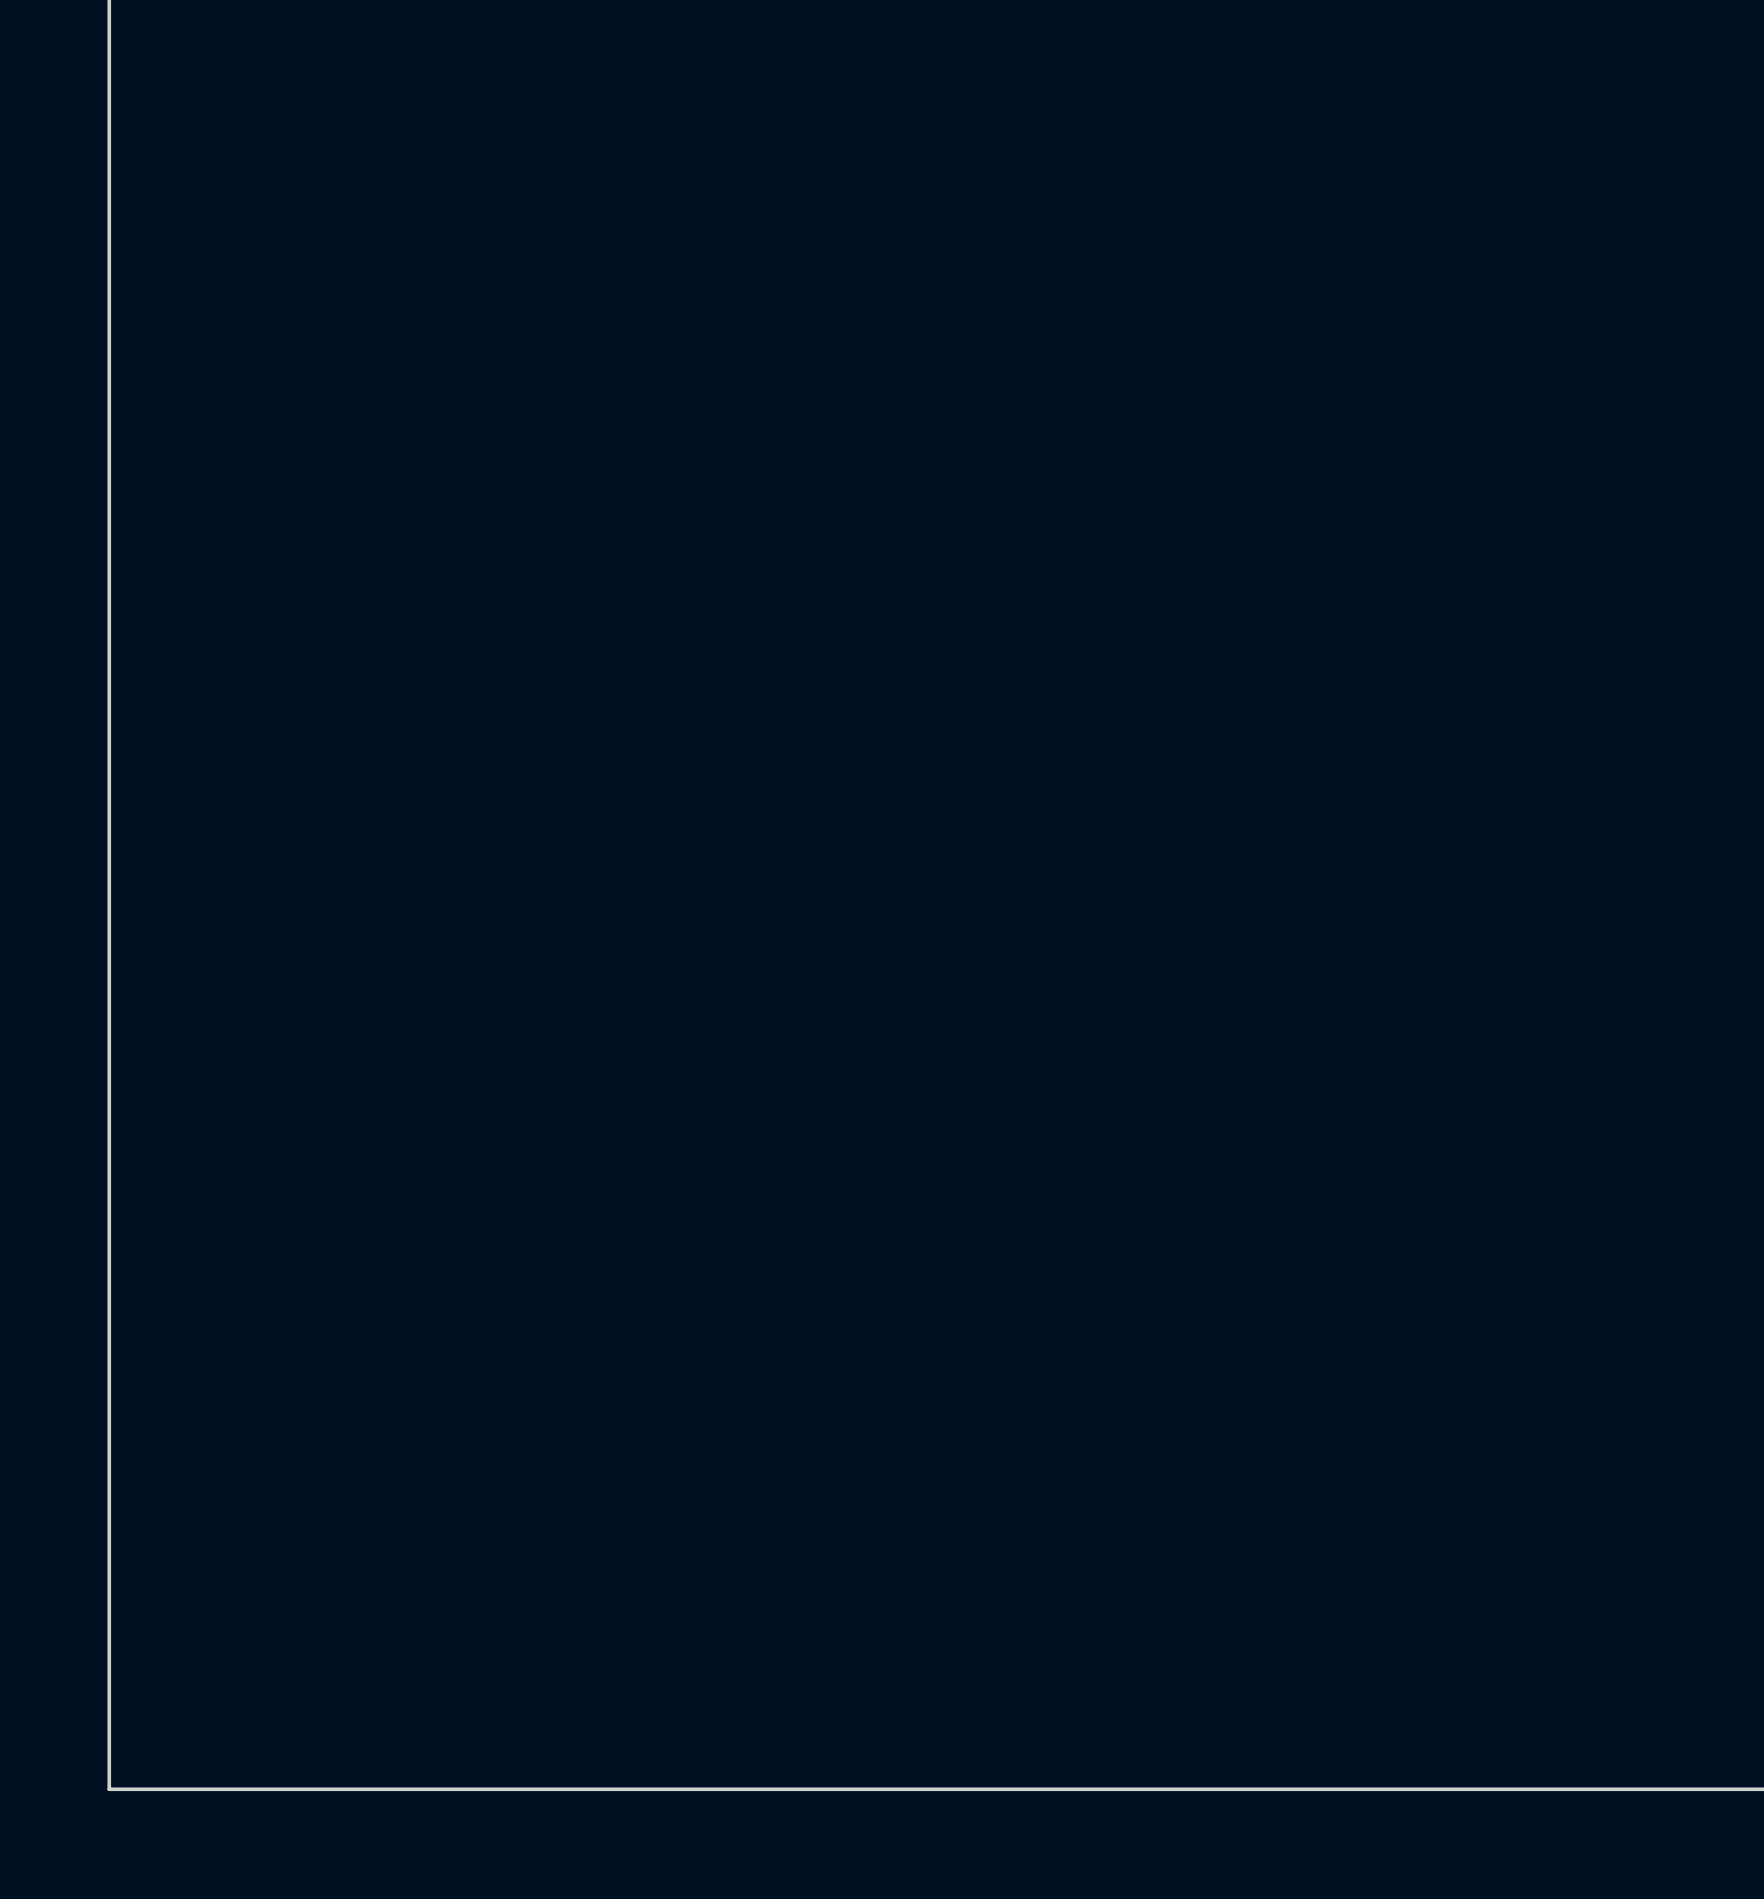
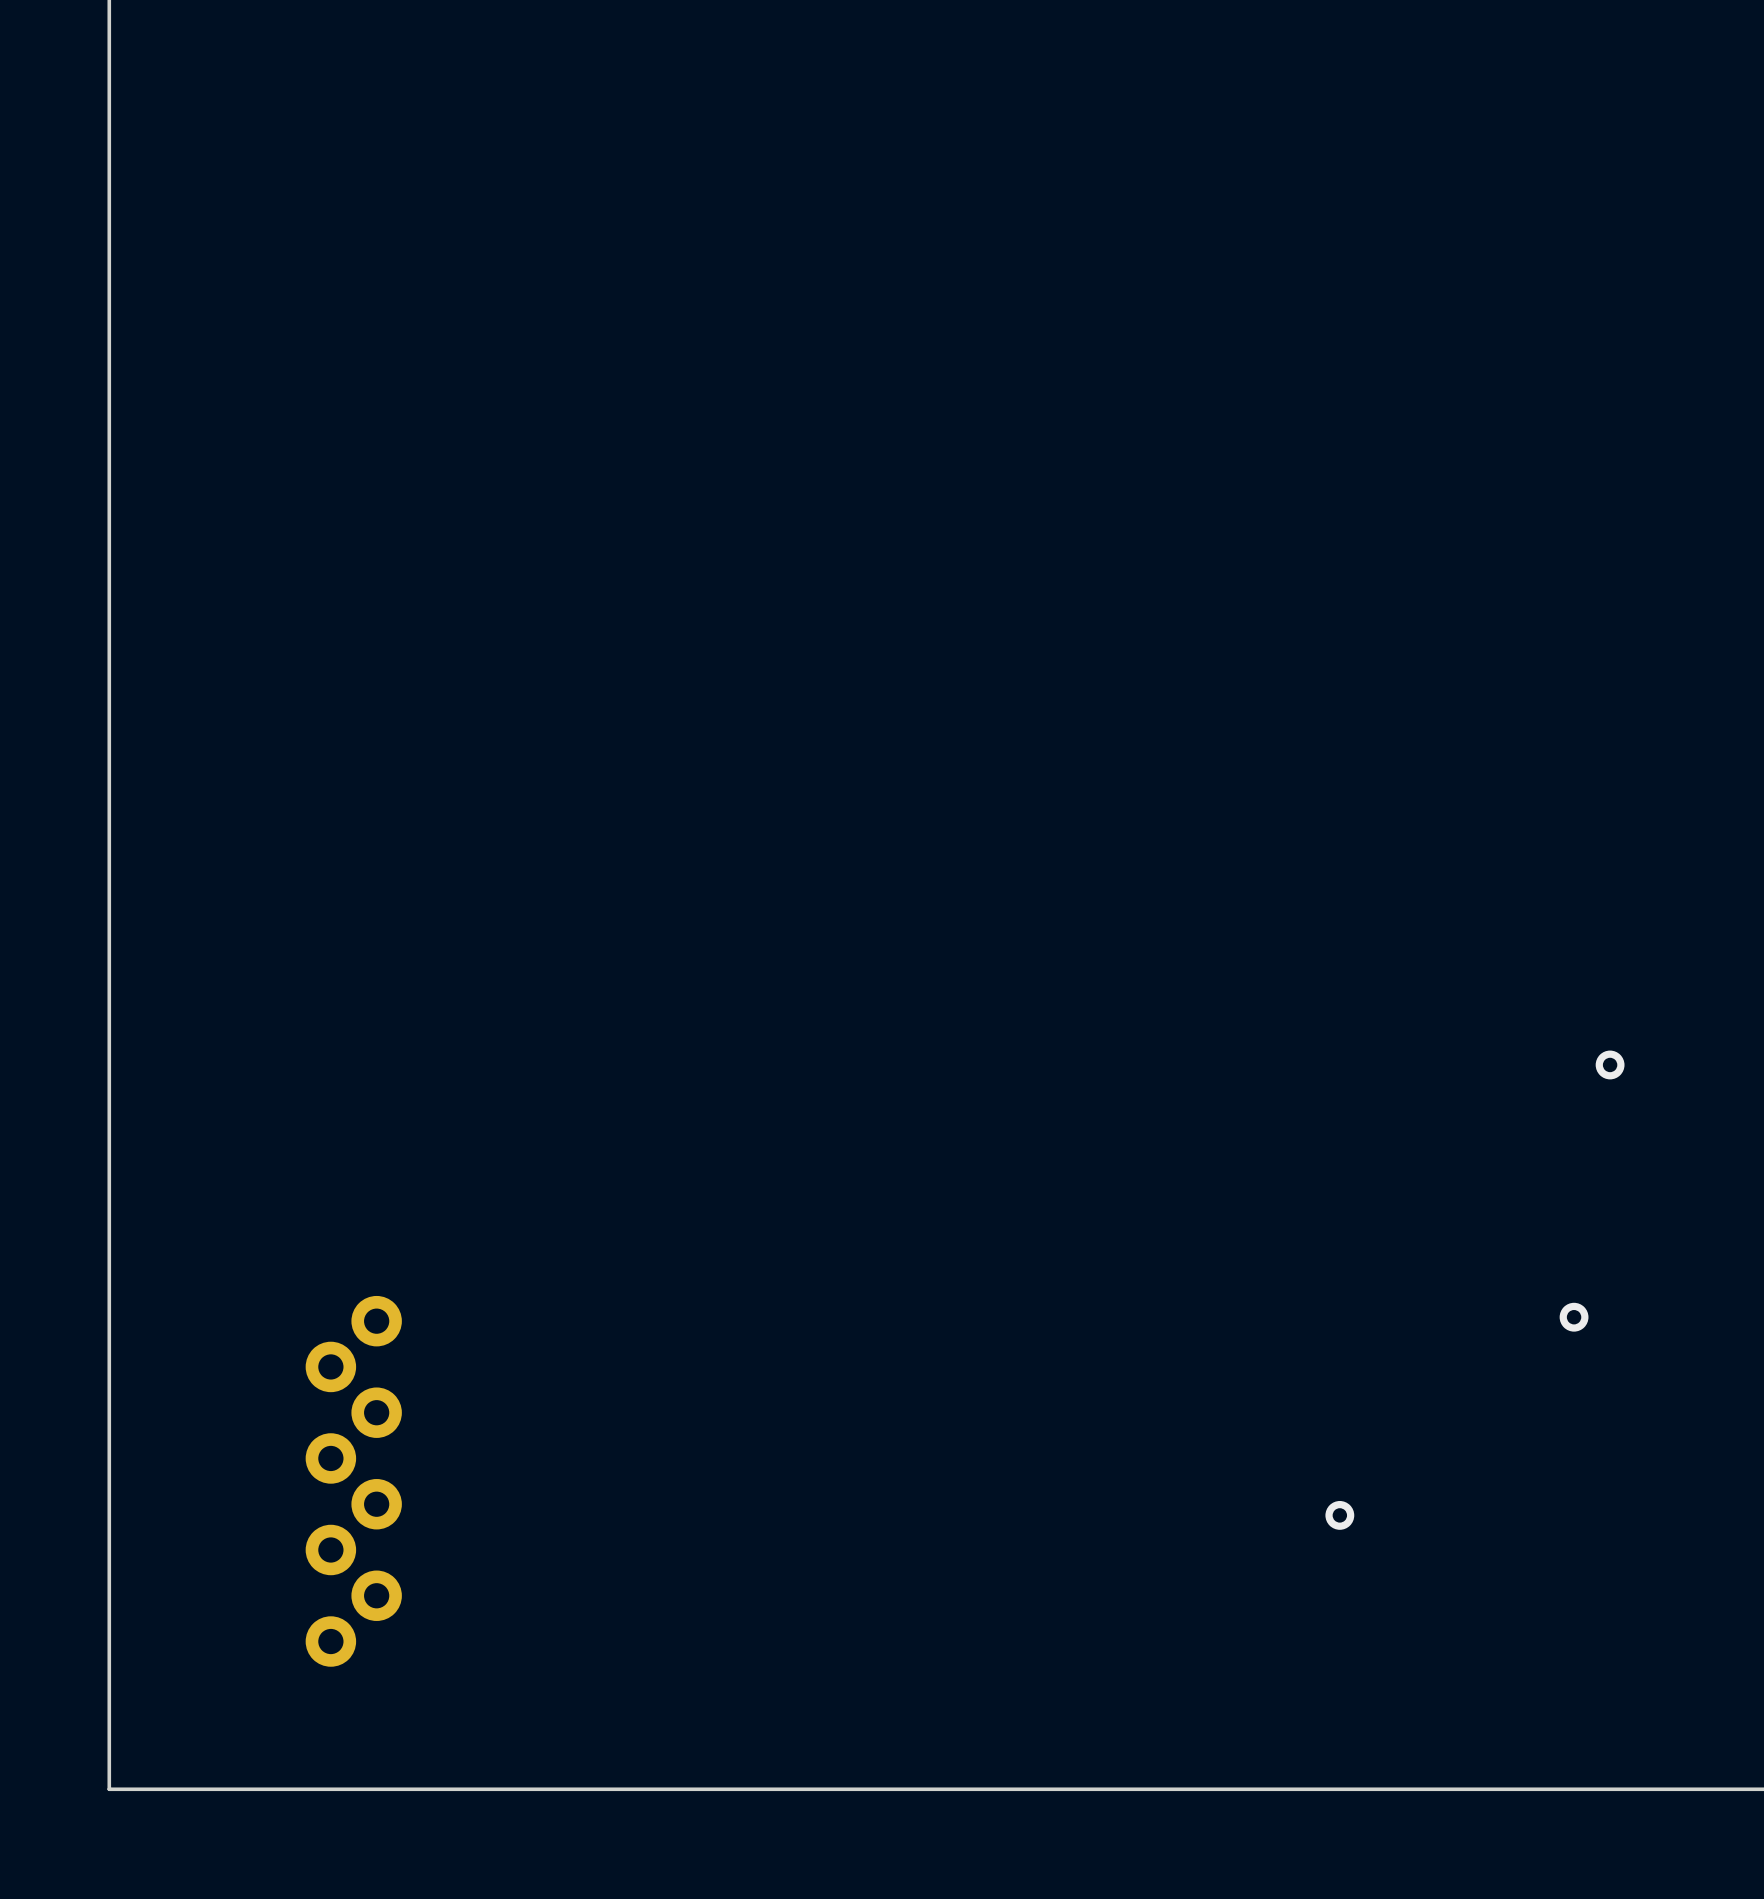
via: none -> (1610, 1064)
via: none -> (1574, 1317)
part: none -> (353, 1481)
via: none -> (1339, 1515)

